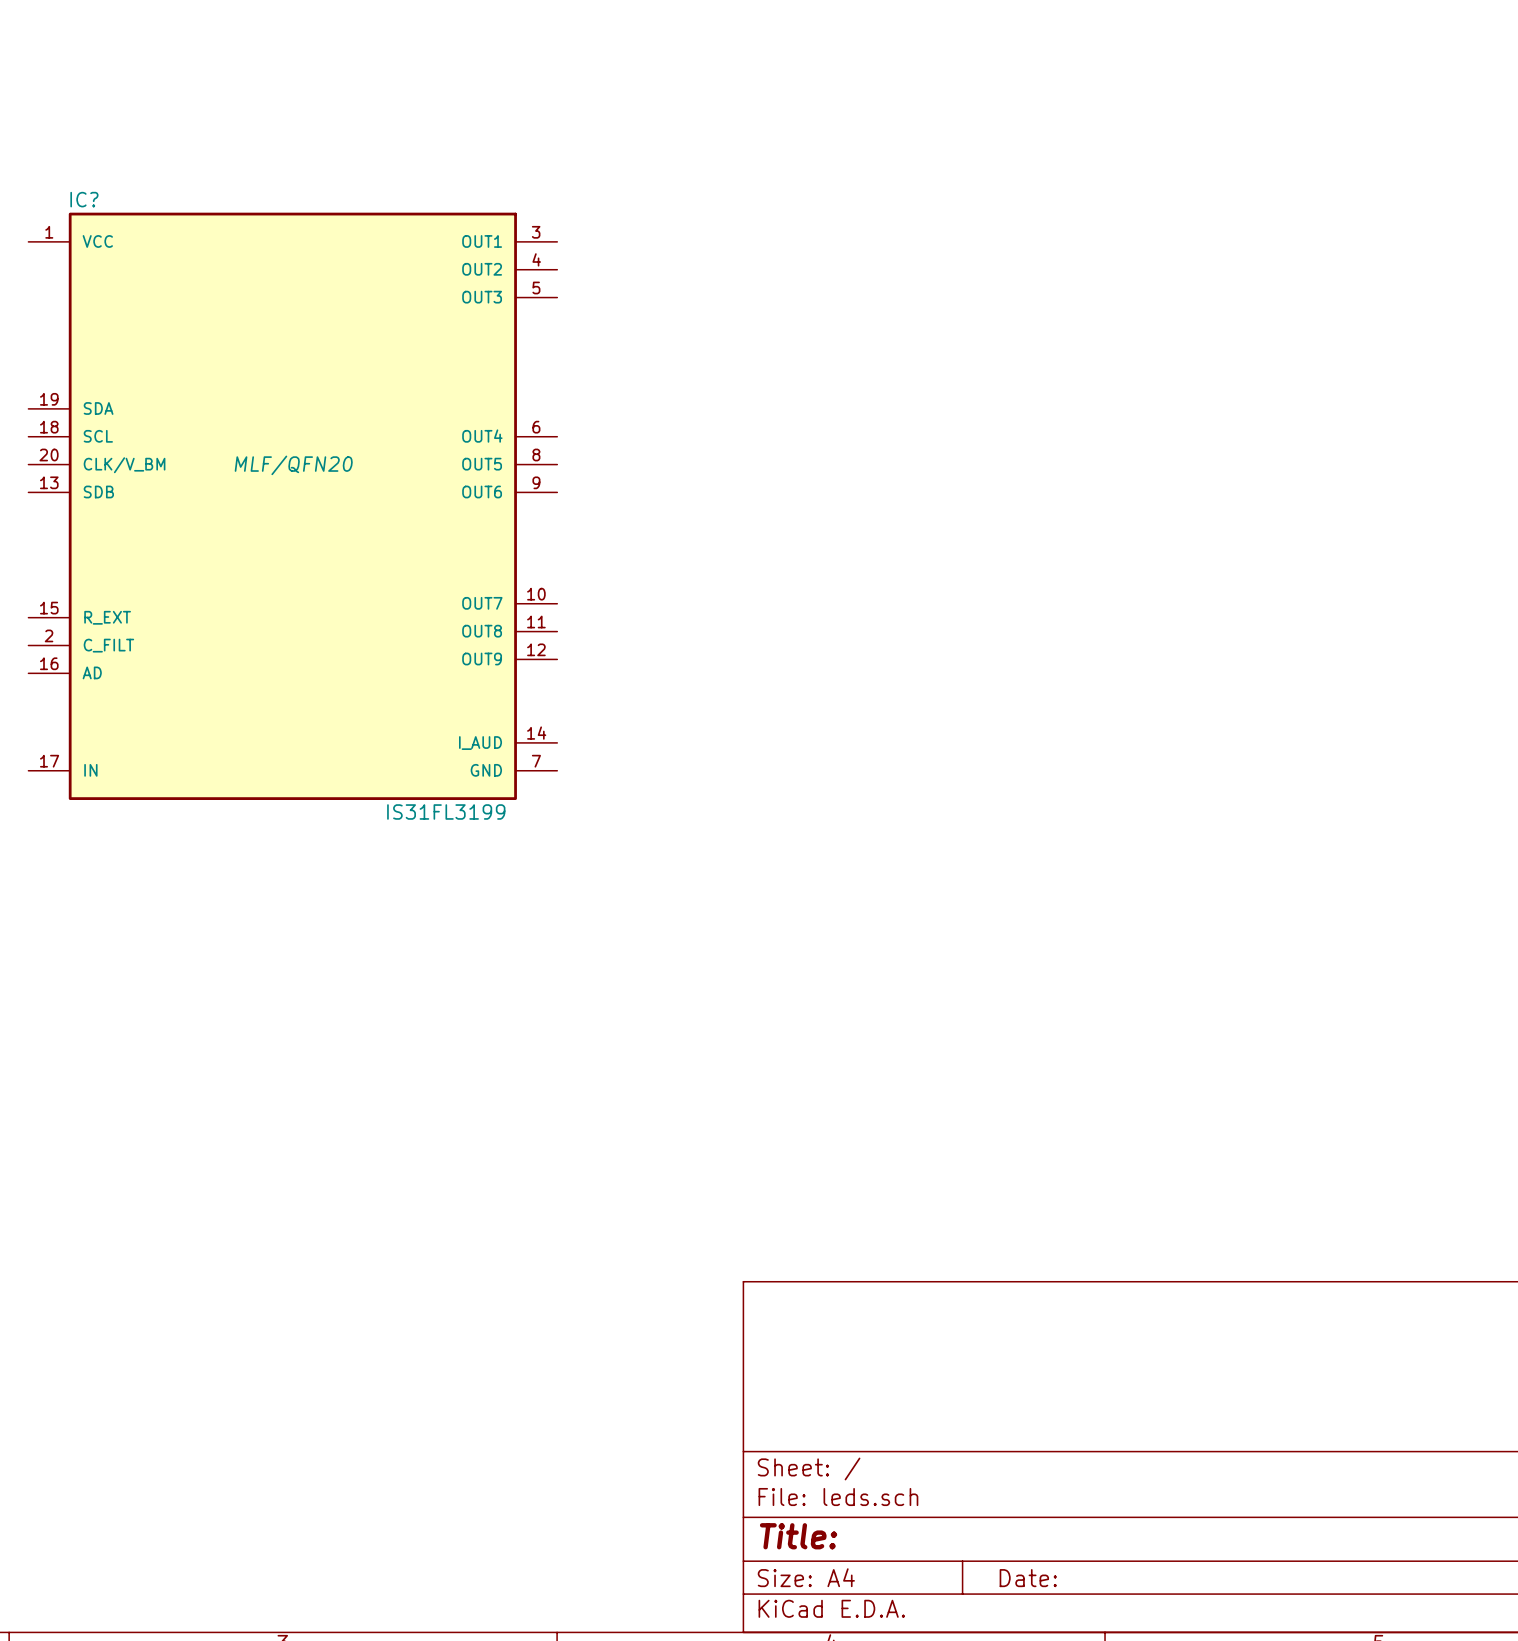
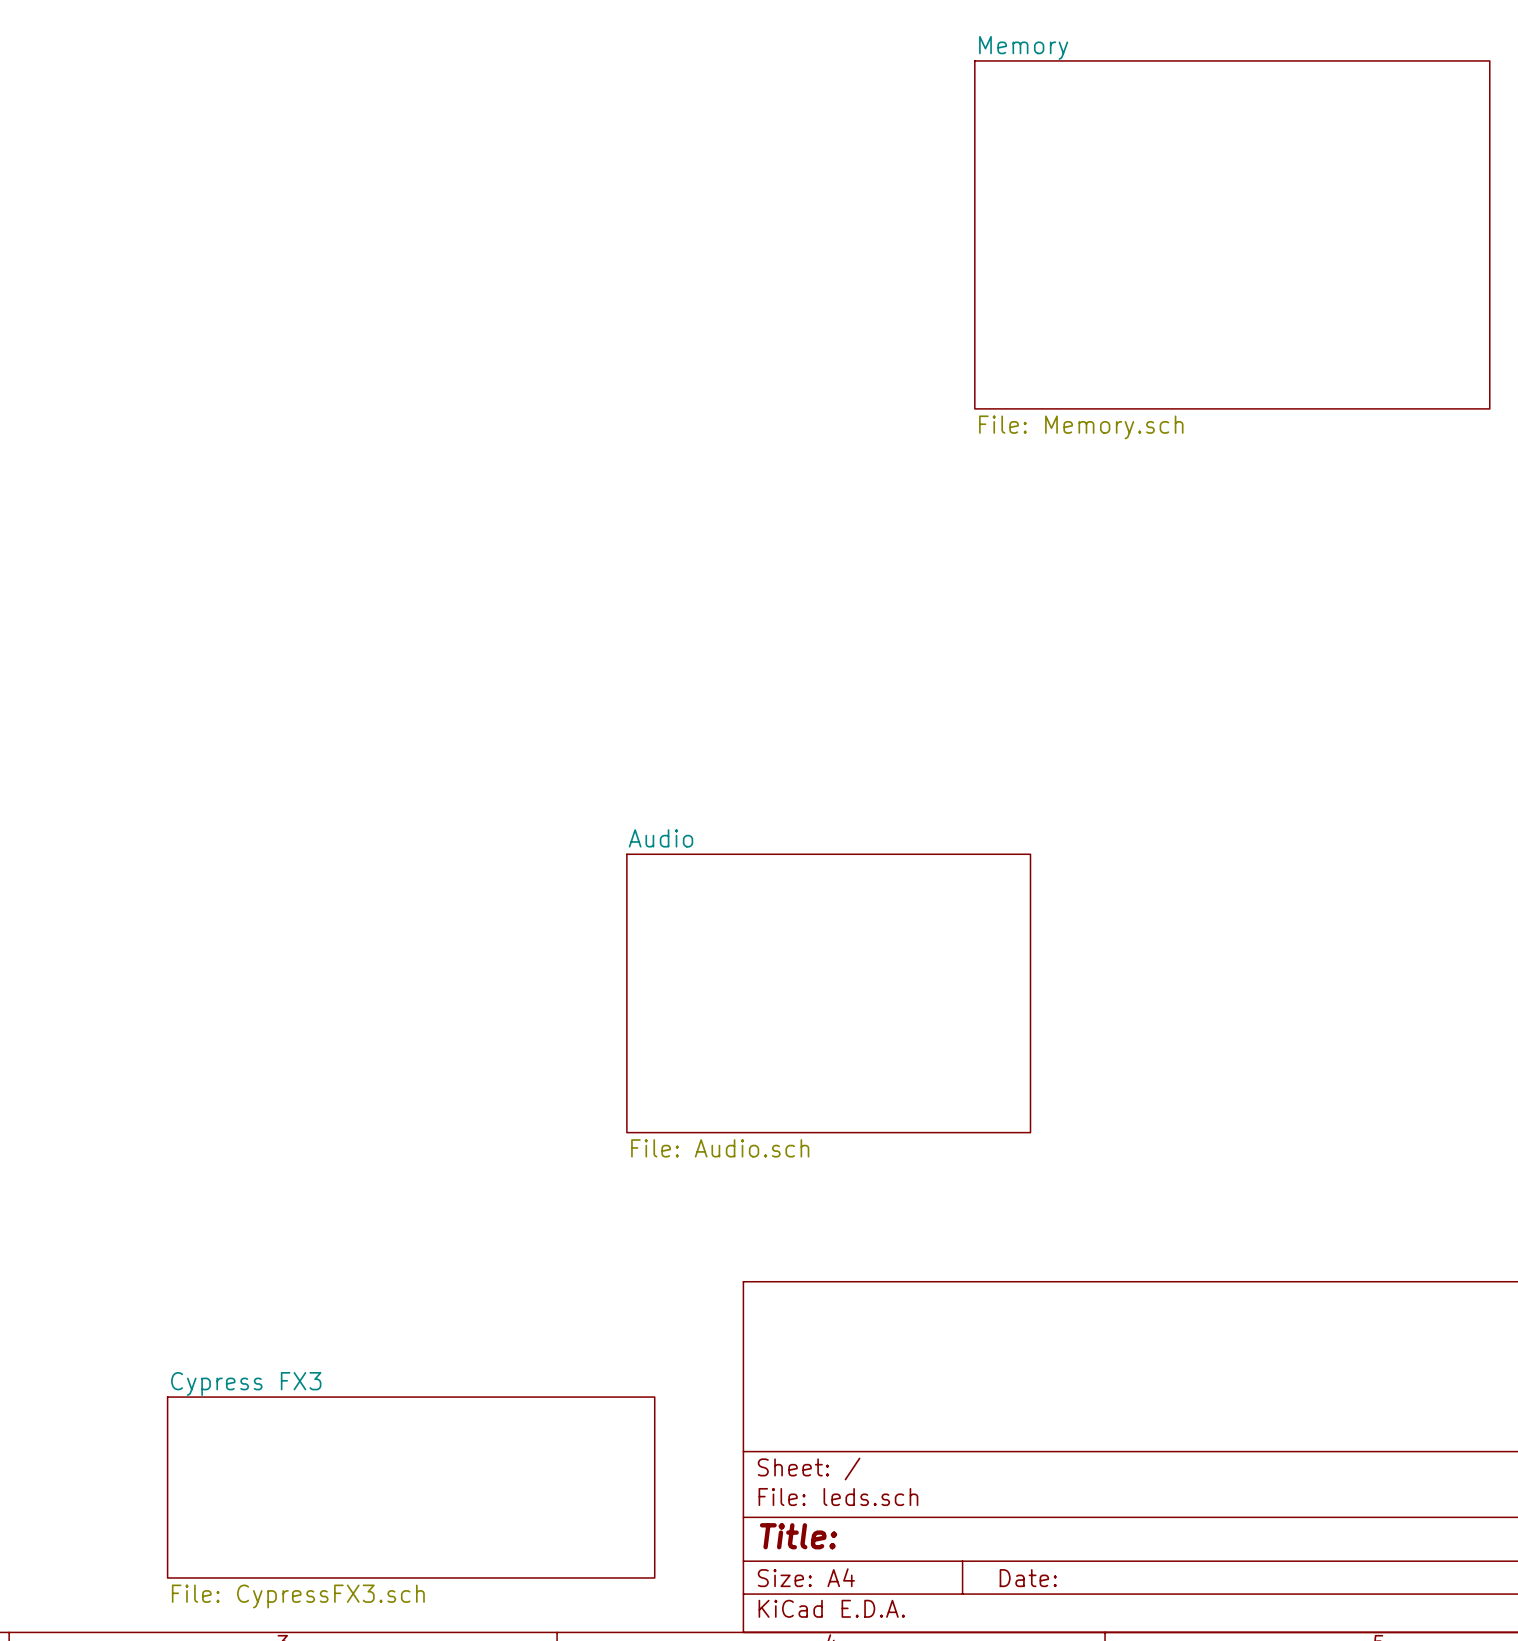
sheet Memory: none -> File: Memory.sch (1232, 234)
IC?: IS31FL3199 (292, 506) -> none
sheet Audio: none -> File: Audio.sch (828, 993)
sheet Cypress FX3: none -> File: CypressFX3.sch (411, 1487)

